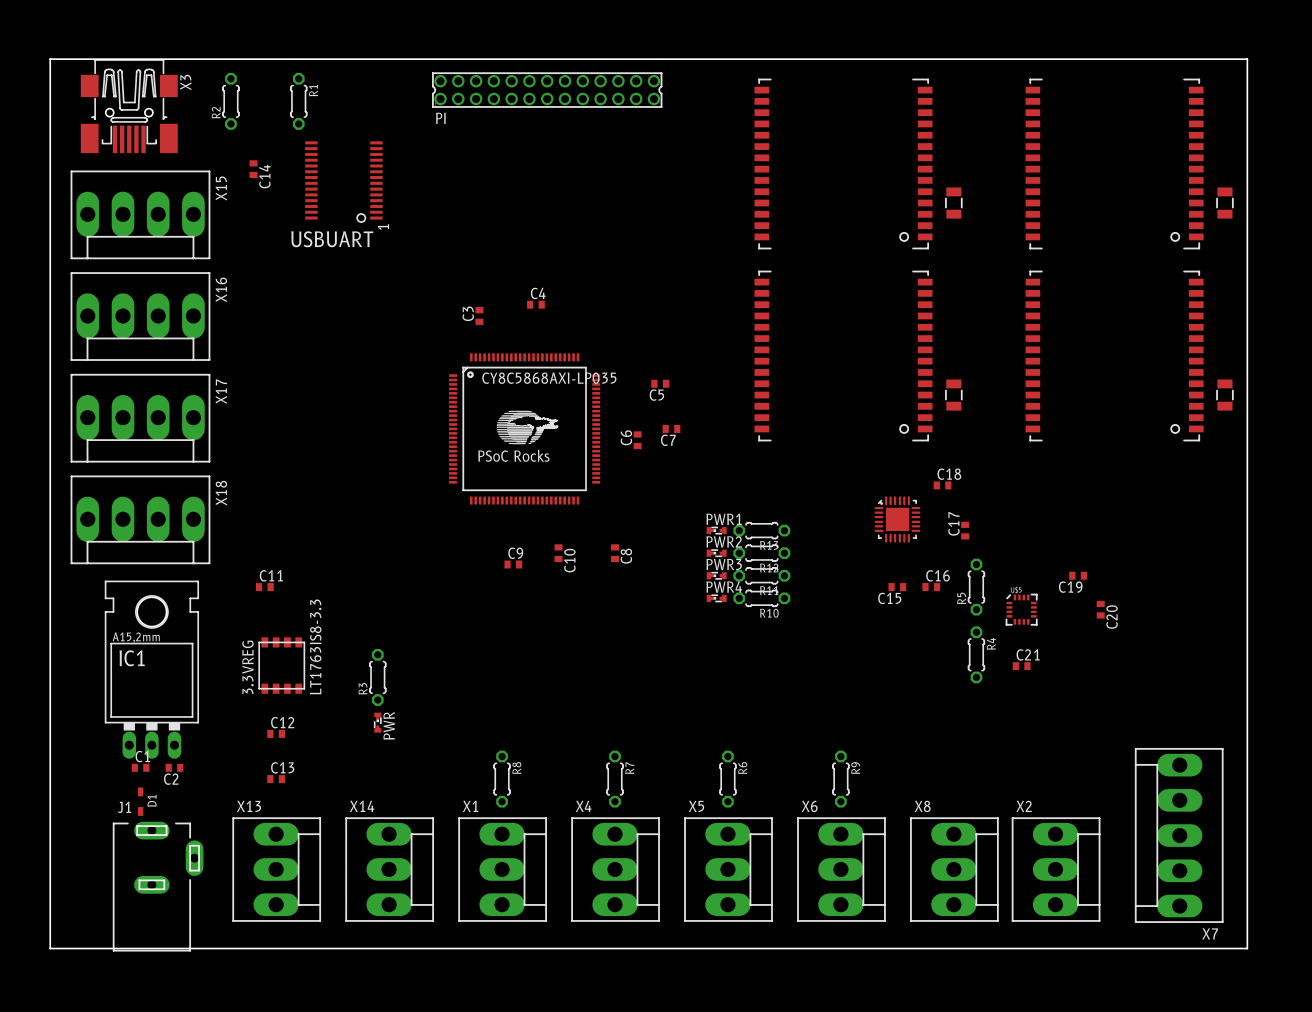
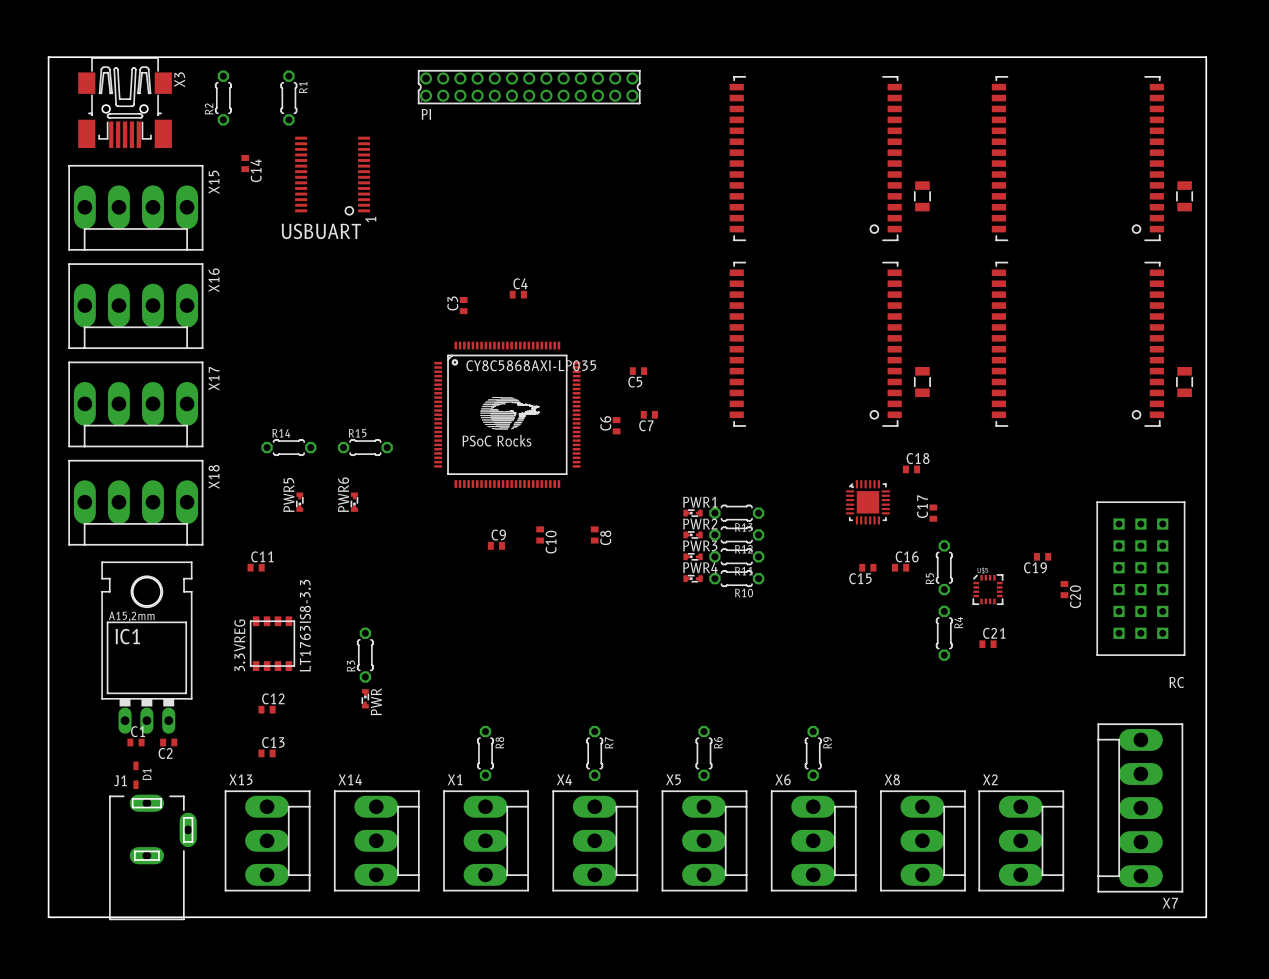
R14: none -> (288, 447)
R15: none -> (365, 447)
PWR5: none -> (299, 502)
PWR6: none -> (354, 502)
RC: none -> (1140, 578)

